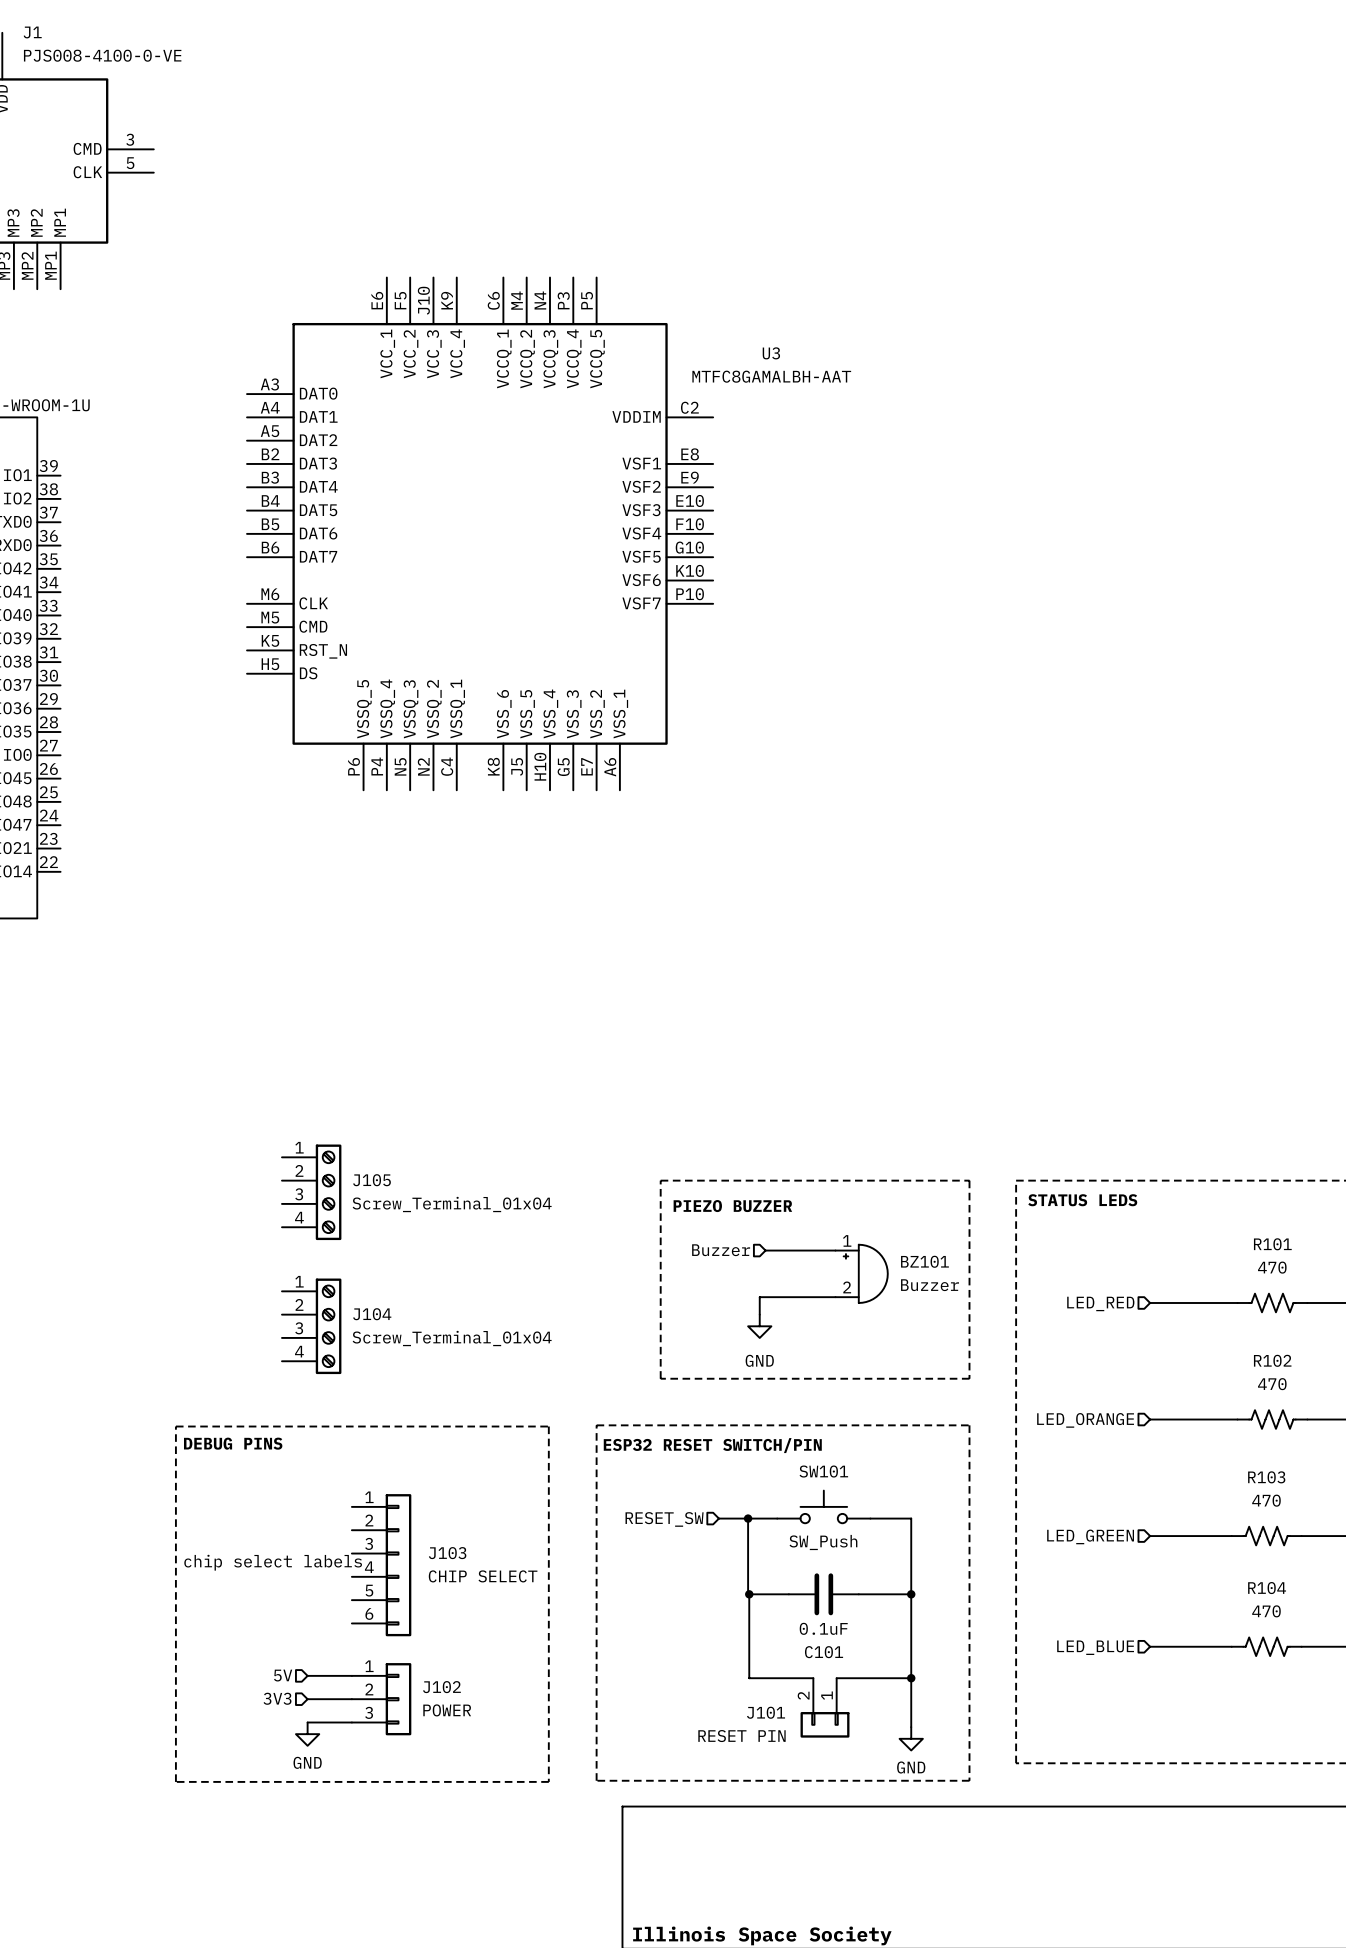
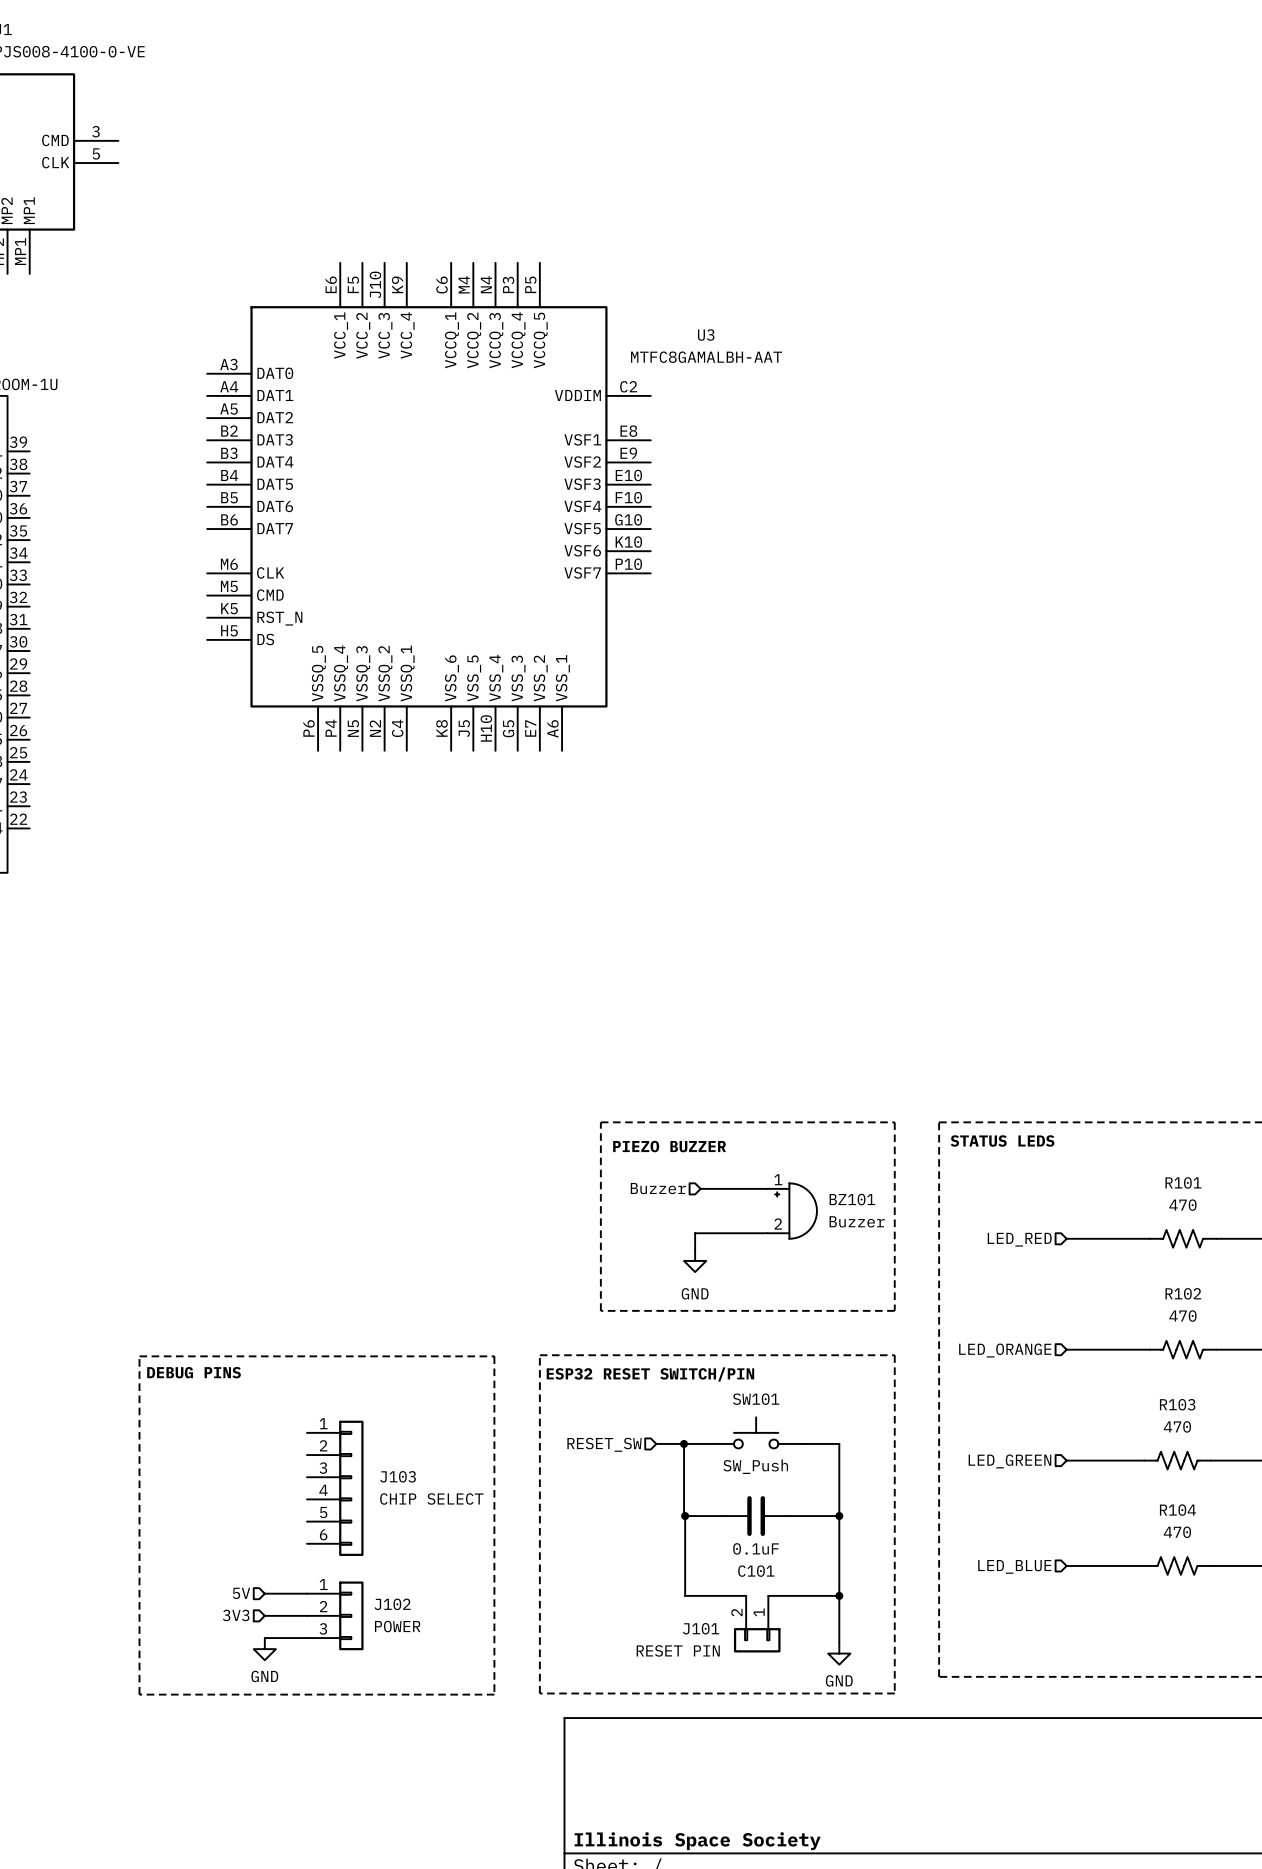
J105: Screw_Terminal_01x04 (311, 1192) -> none
J104: Screw_Terminal_01x04 (311, 1326) -> none
text: chip select labels (273, 1562) -> none

